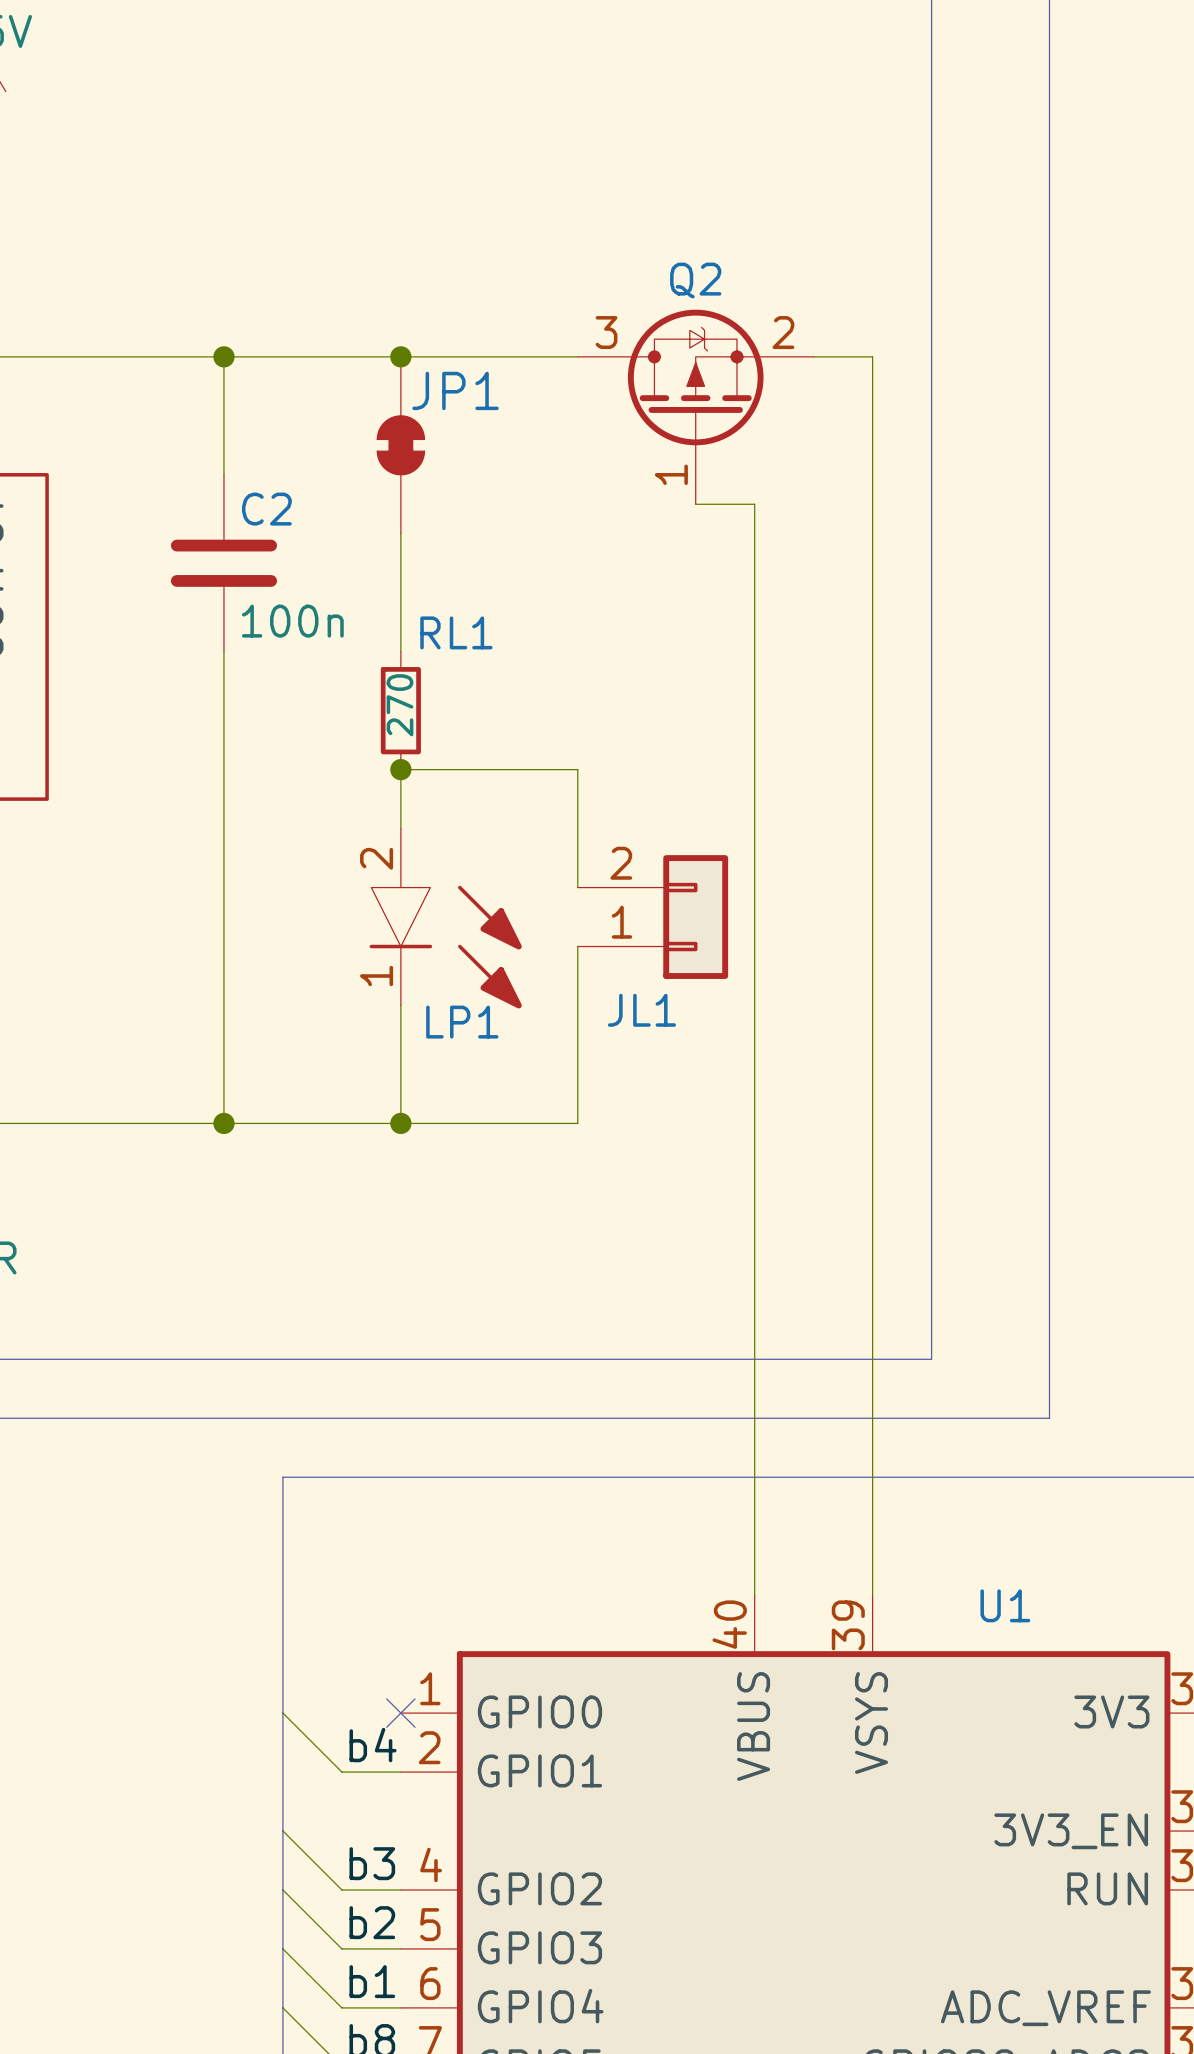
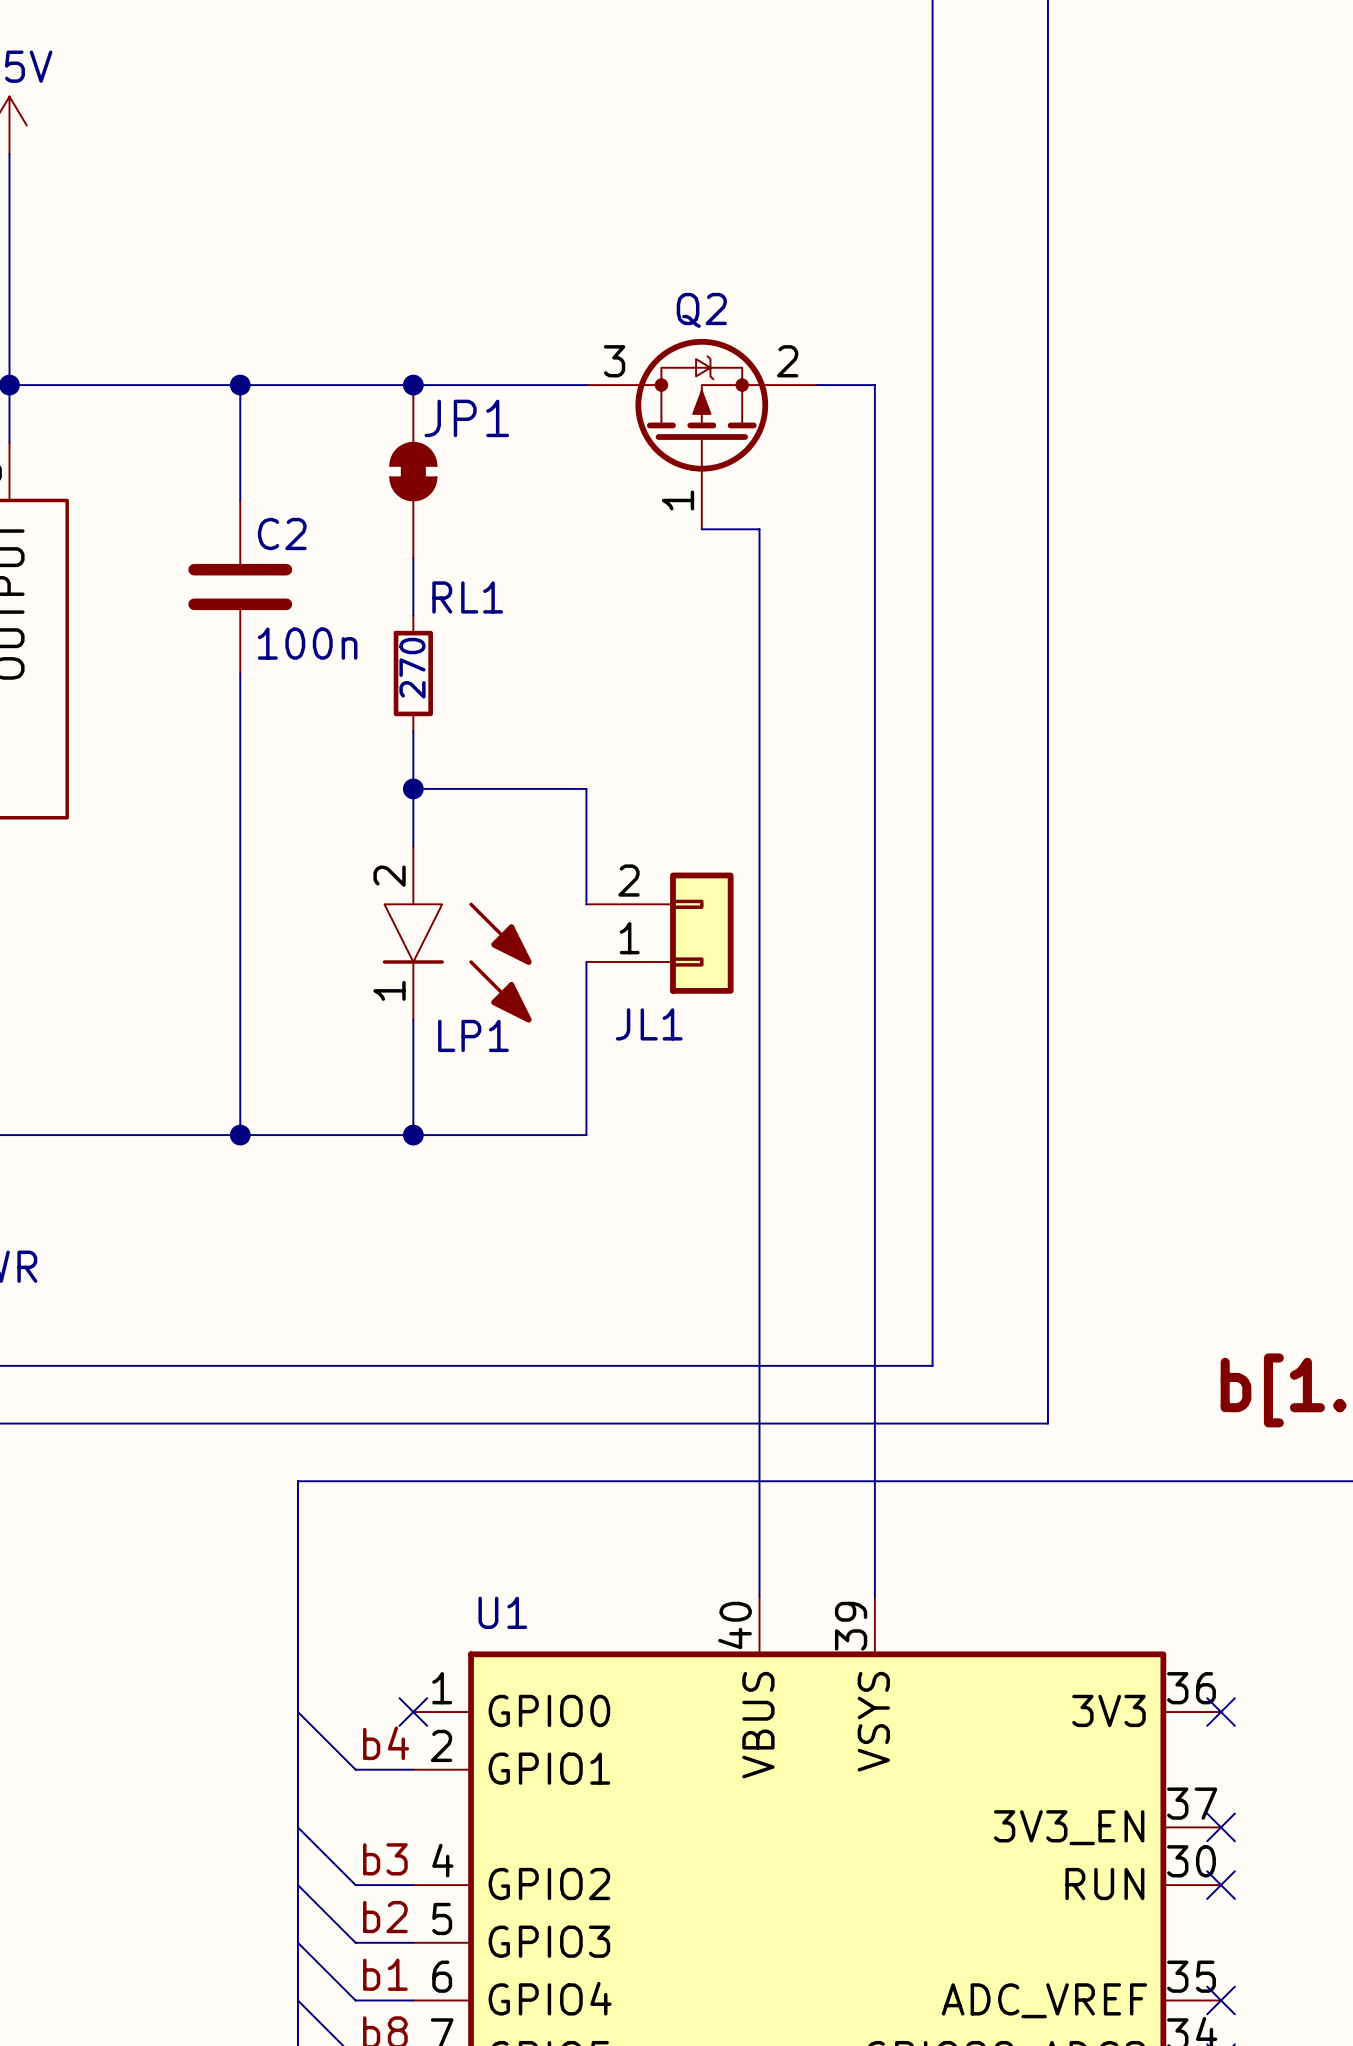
wire: (400, 592) (400, 651) -> (413, 731) (413, 788)
RL1 position: (400, 710) -> (413, 673)
U1 name position: U1 (1005, 1605) -> U1 (502, 1612)

